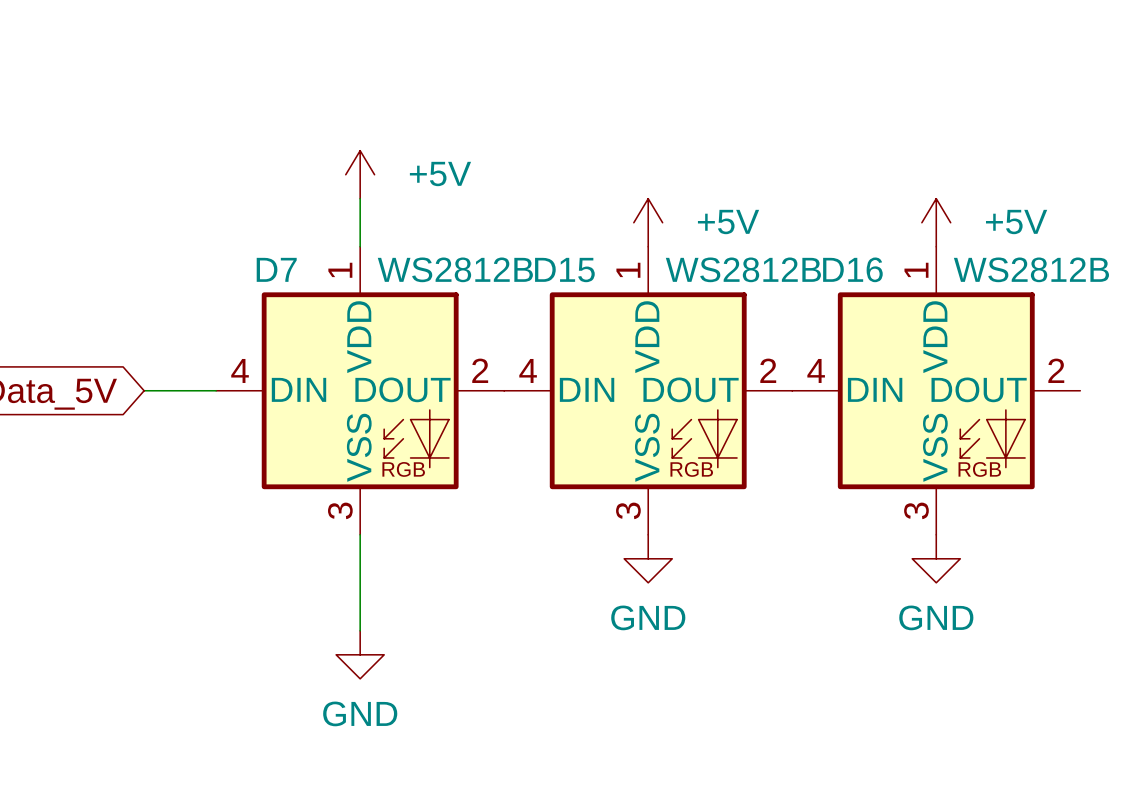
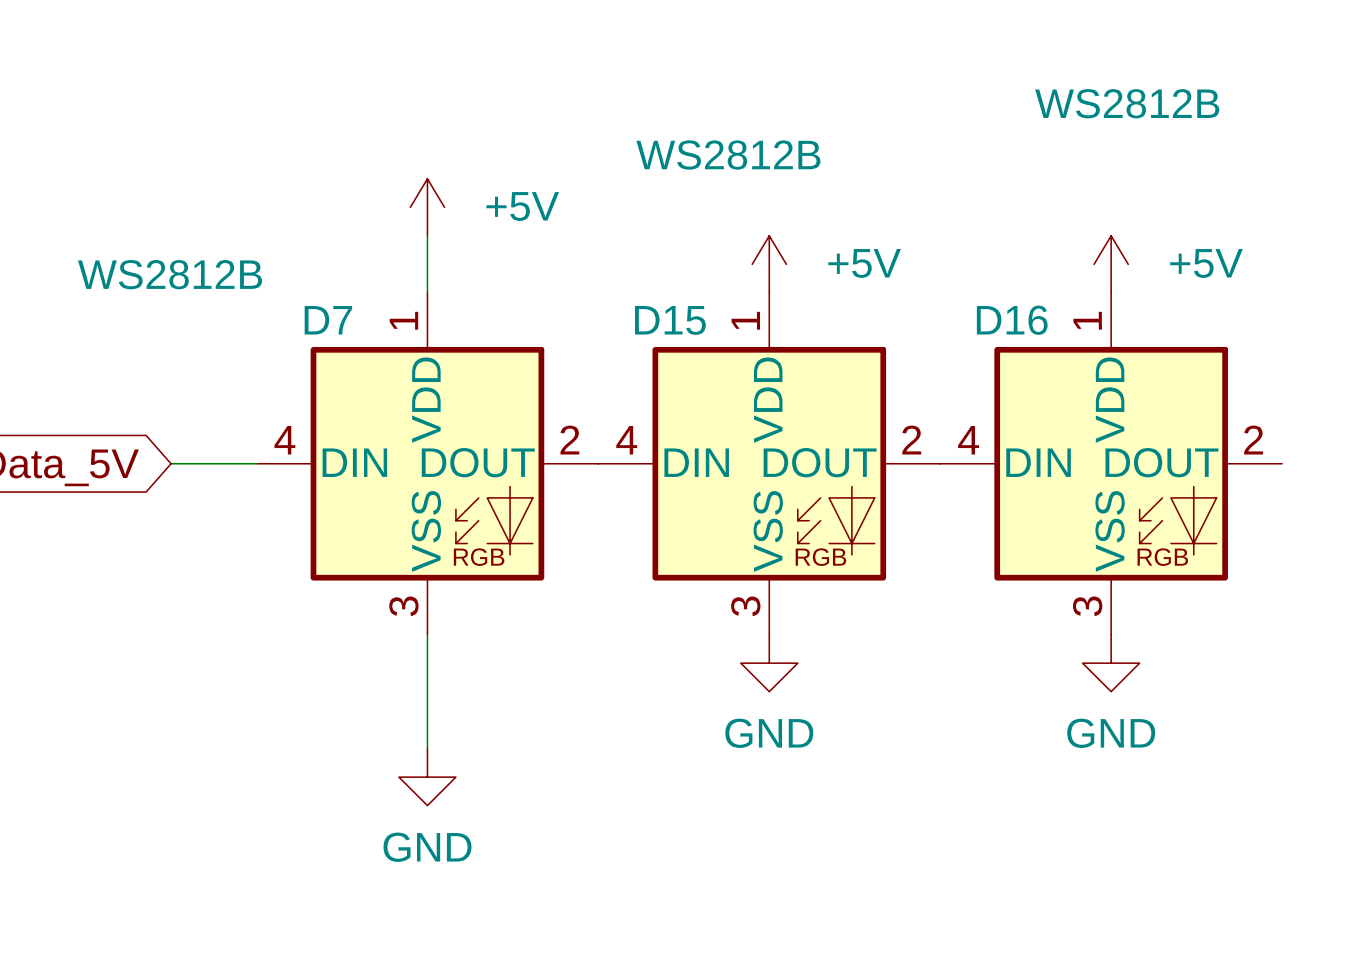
D7 value position: WS2812B (455, 269) -> WS2812B (170, 274)
D15 value position: WS2812B (743, 269) -> WS2812B (728, 155)
D16 value position: WS2812B (1031, 269) -> WS2812B (1127, 103)

